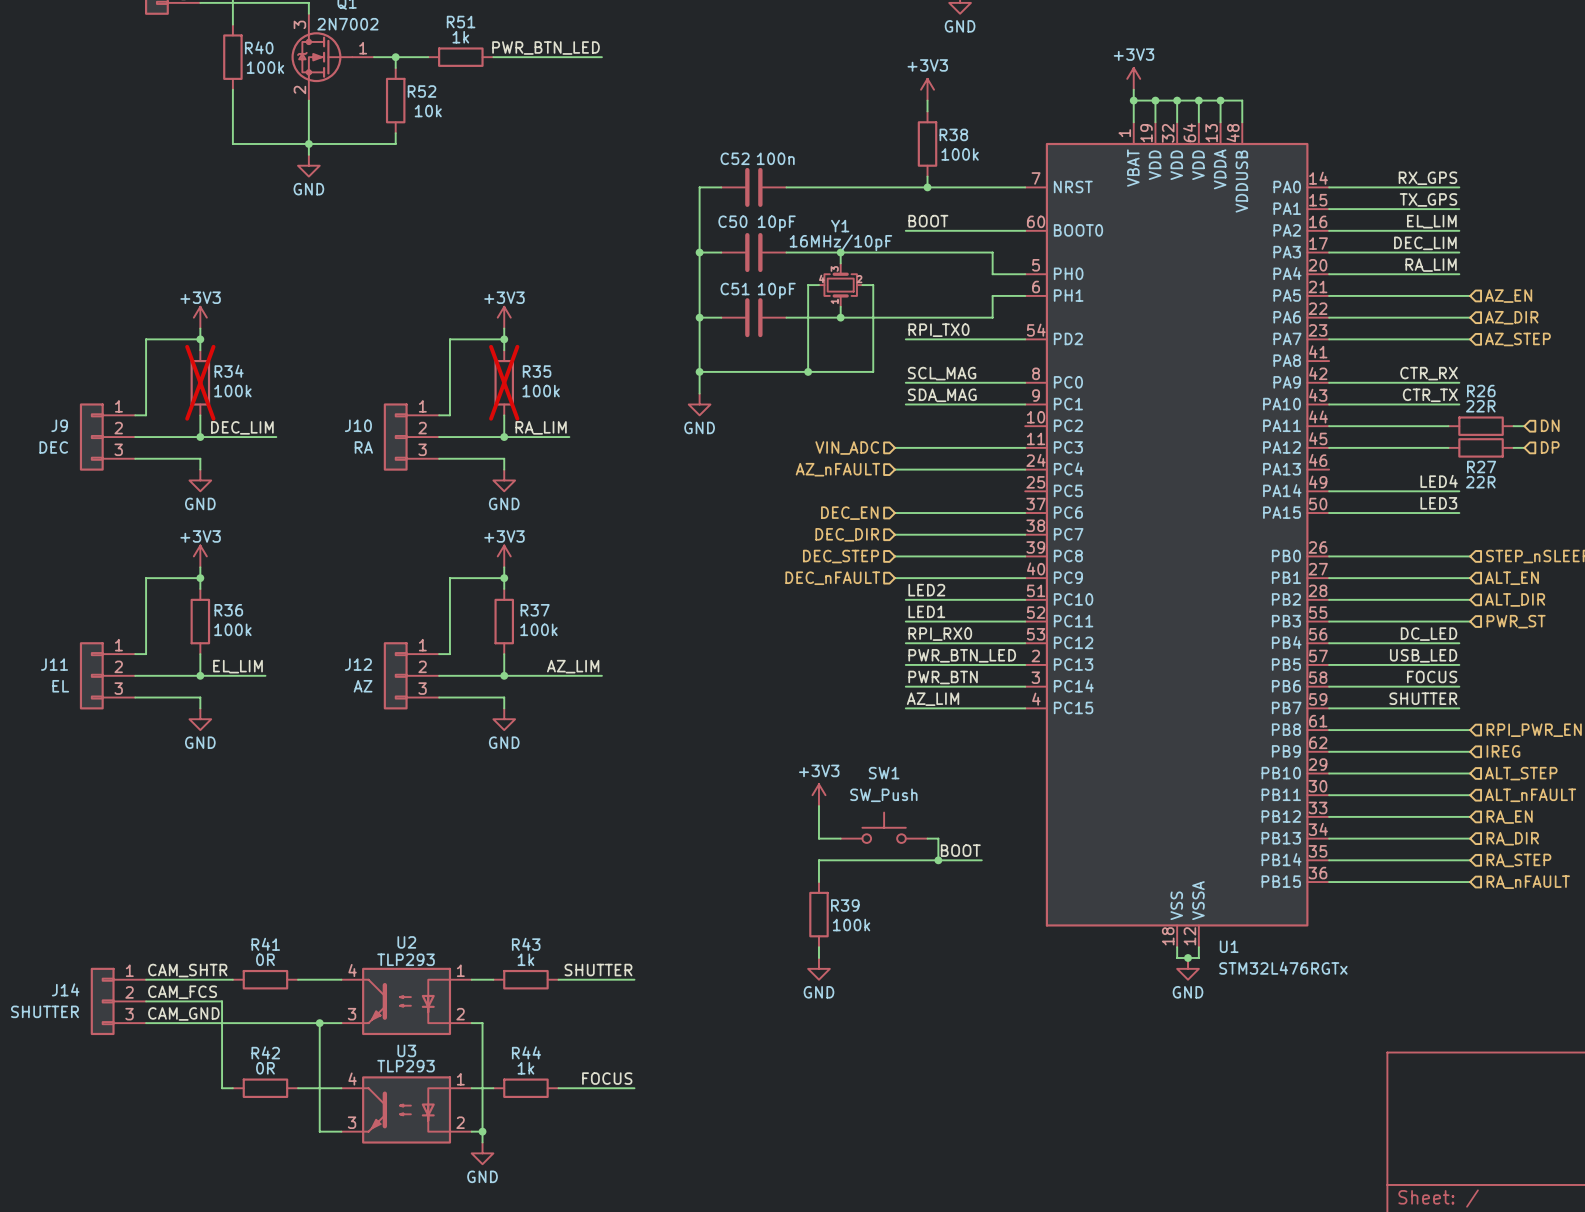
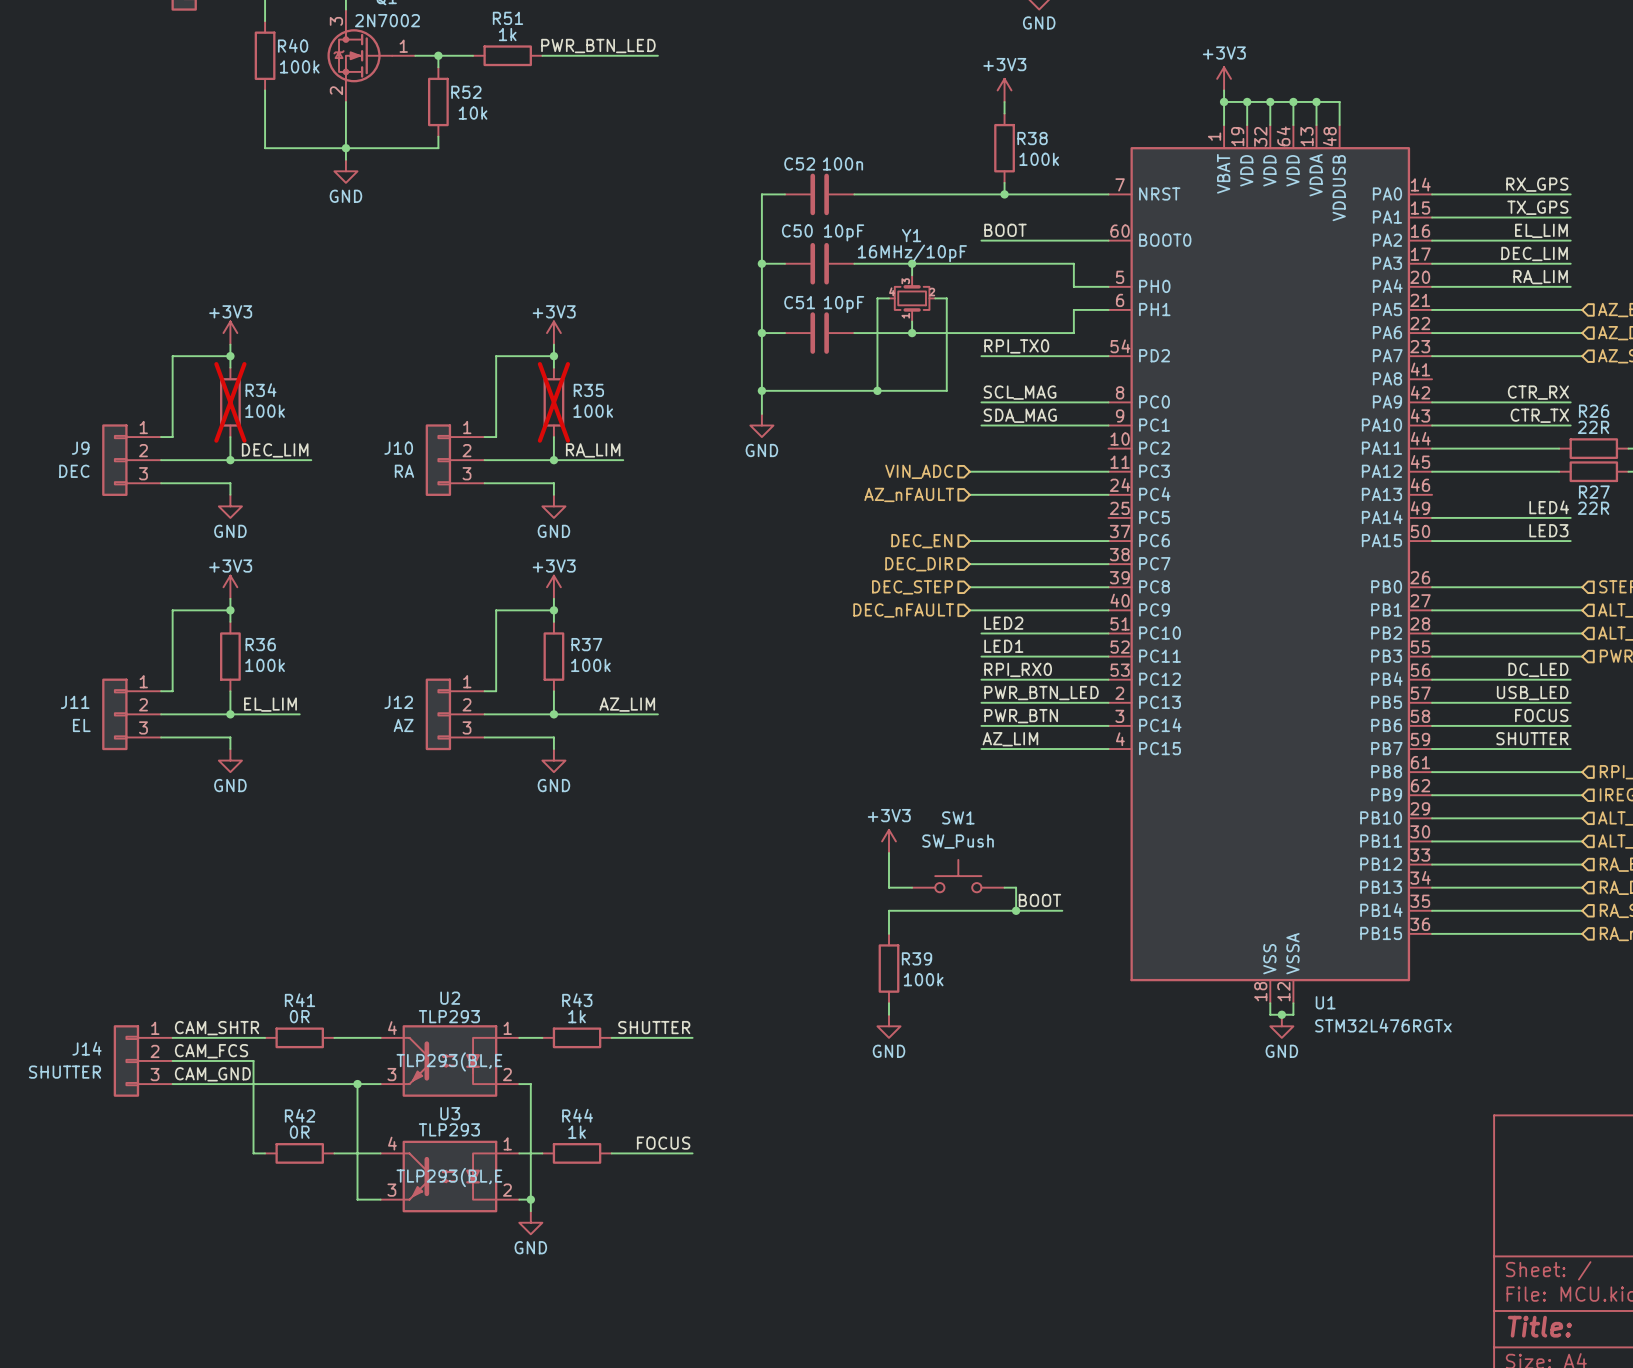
U2 text: none -> TLP293(BL,E (449, 1061)
U3 text: none -> TLP293(BL,E (449, 1177)

